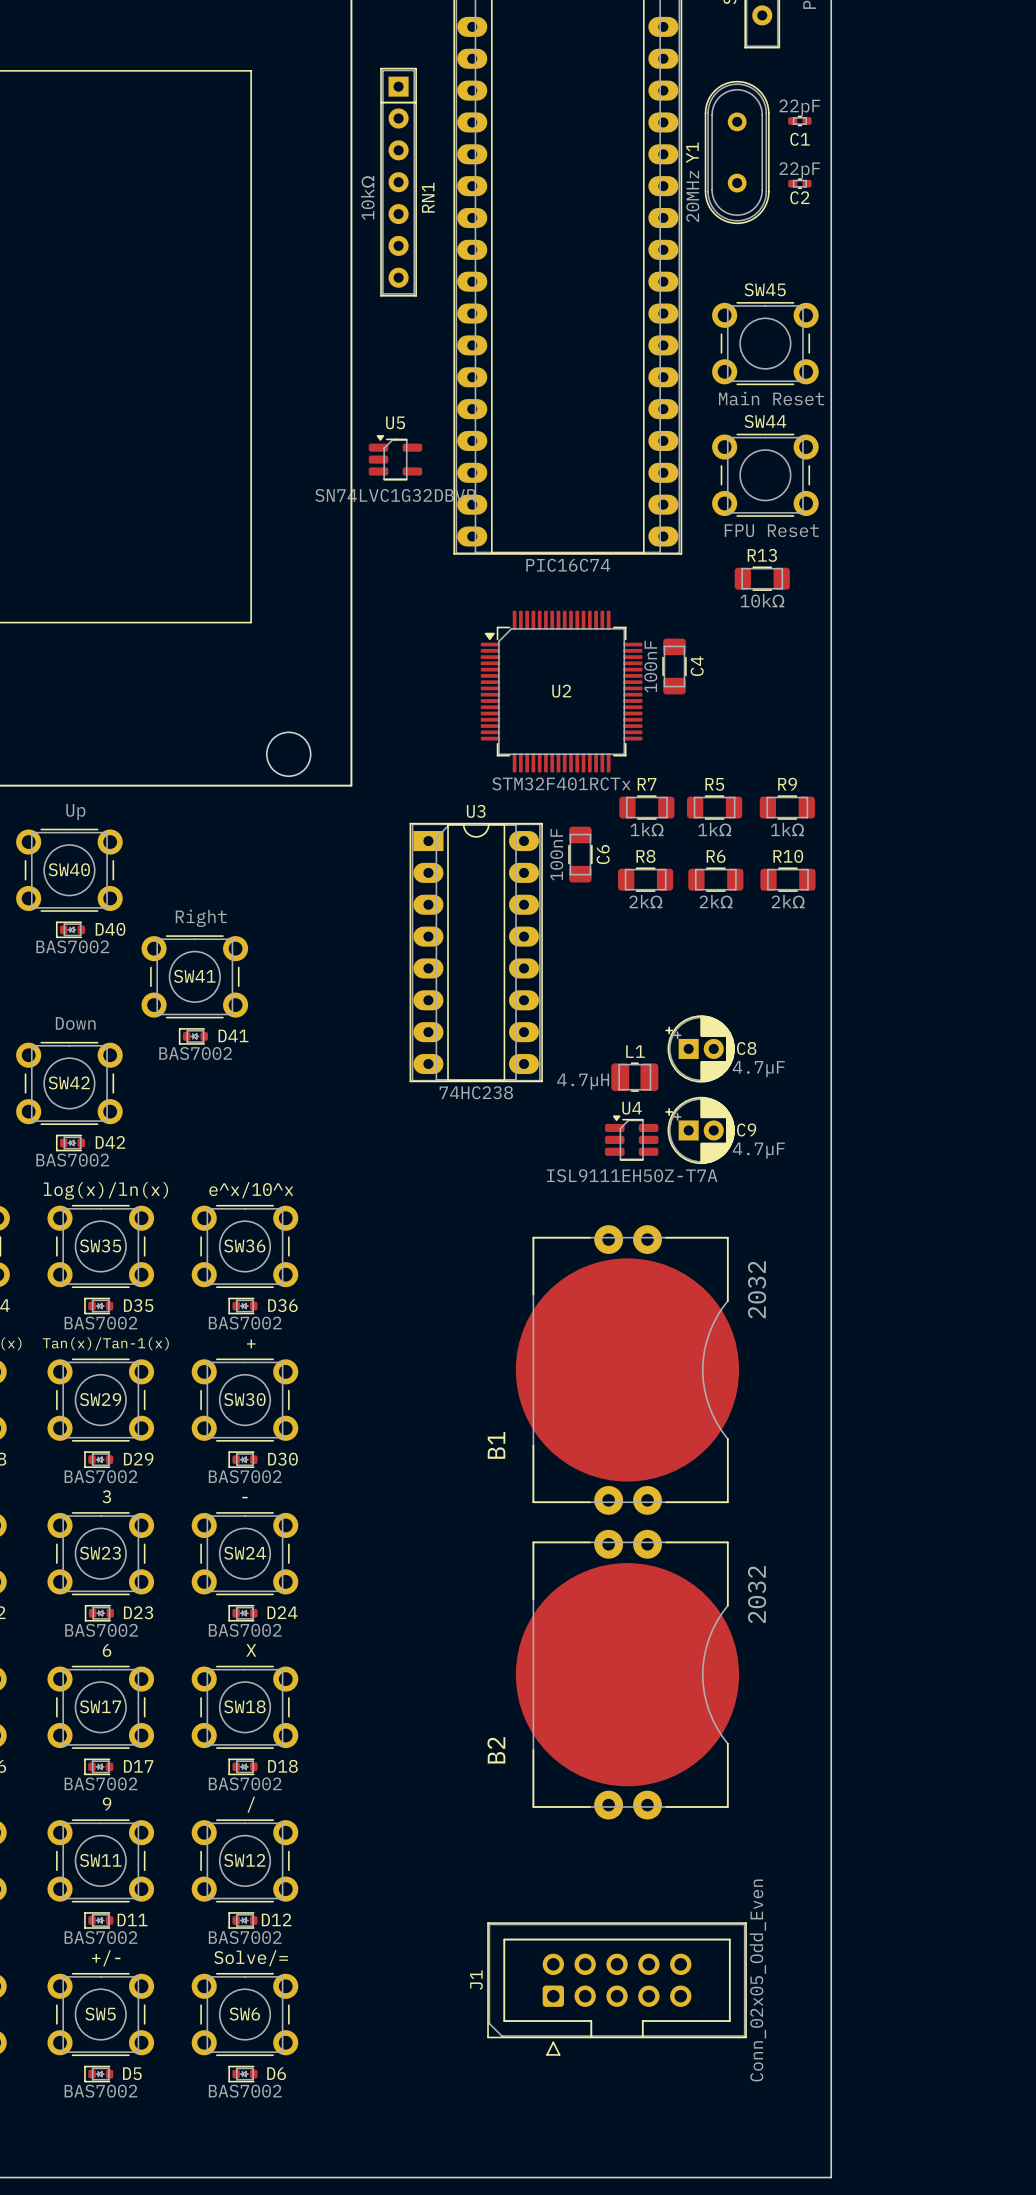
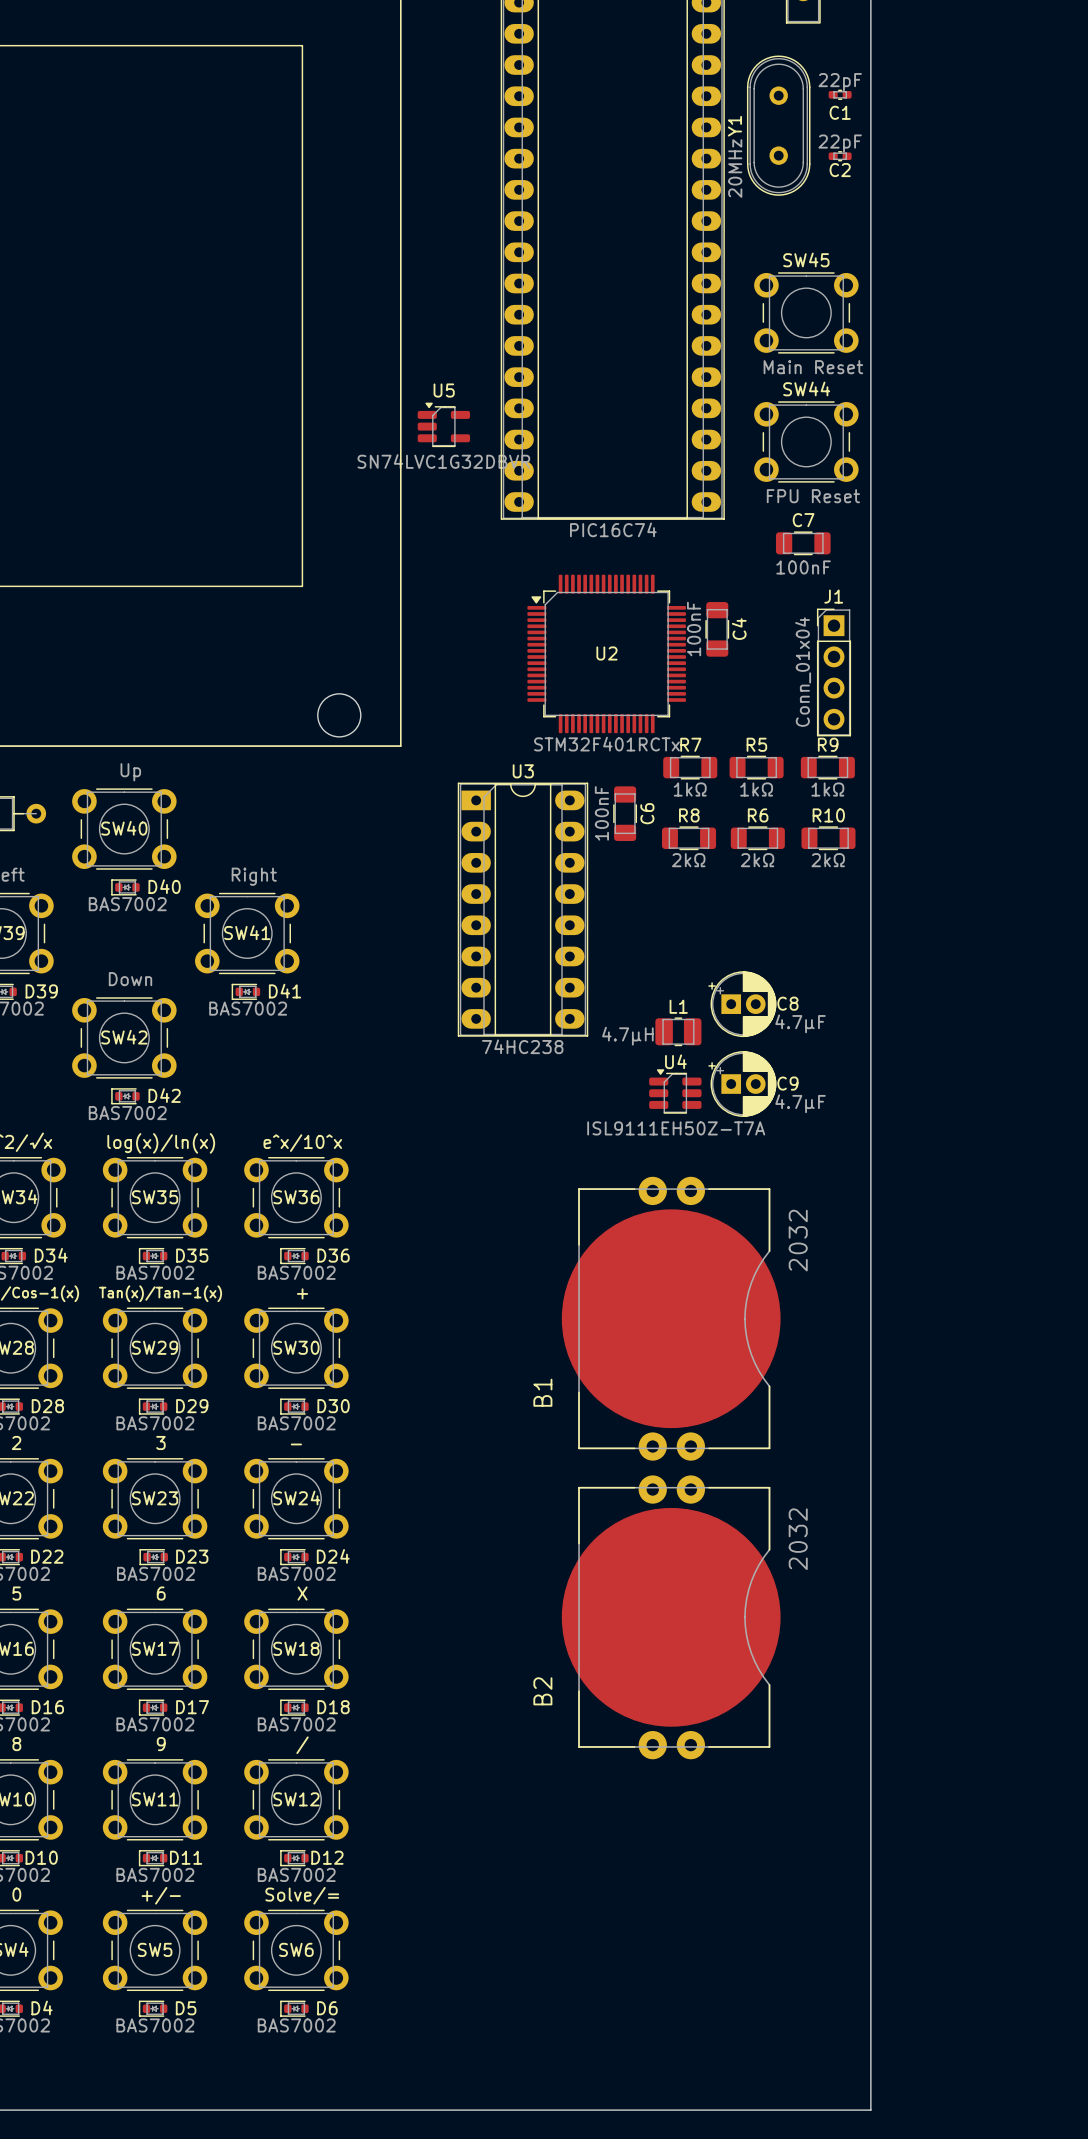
RN1: 10kΩ (398, 182) -> none
R13: 10kΩ (762, 578) -> none
C7: none -> 100nF (803, 543)
J1 footprint: [487, 1922, 747, 2056] -> [816, 608, 852, 737]
J1 name position: J1 (476, 1980) -> J1 (833, 596)
J1 value: Conn_02x05_Odd_Even (757, 1980) -> Conn_01x04 (803, 672)

